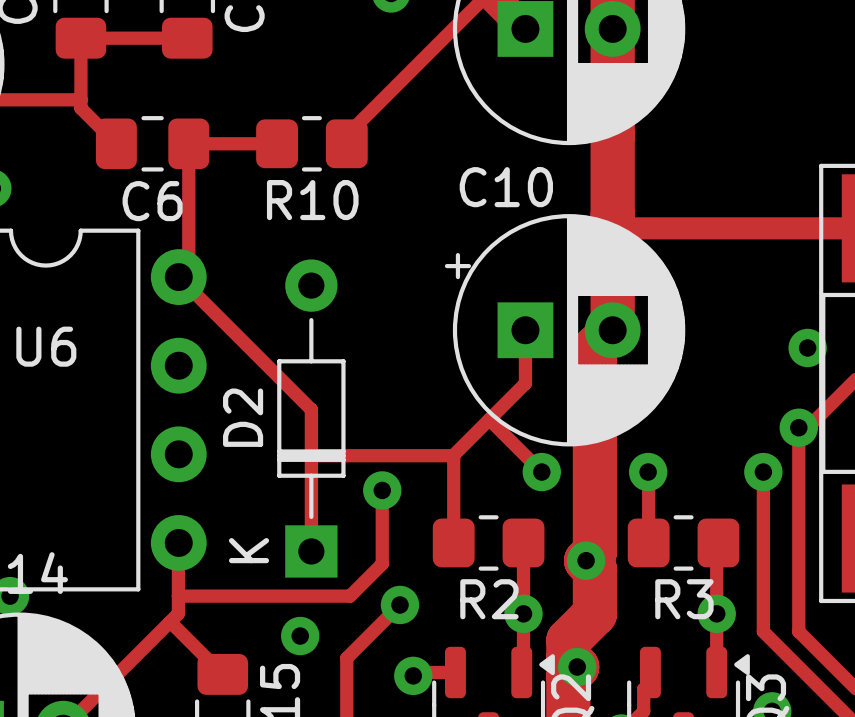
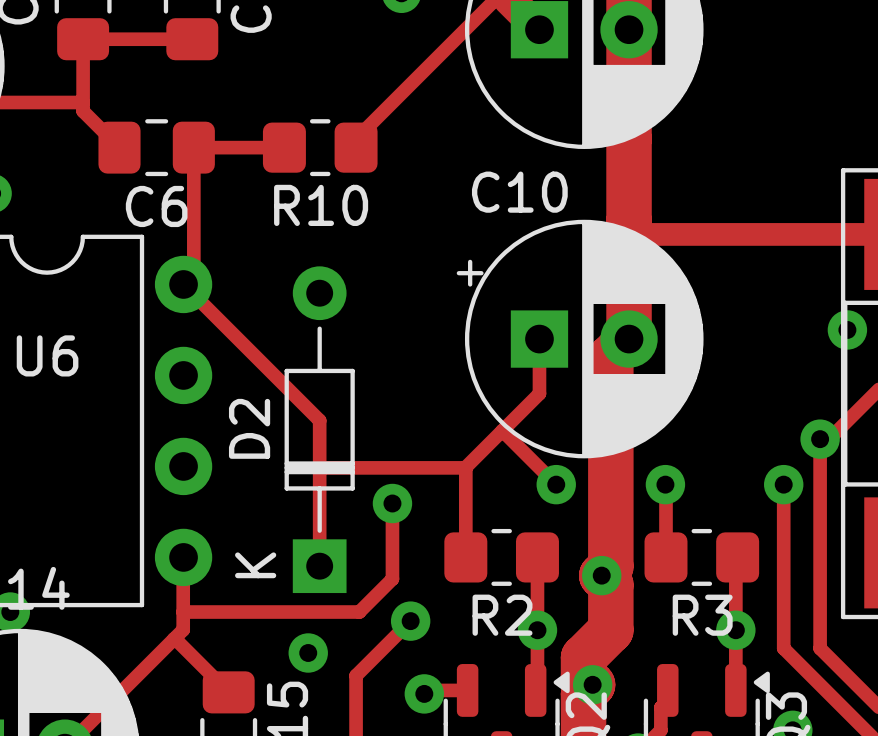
via position: (807, 347) -> (847, 329)

